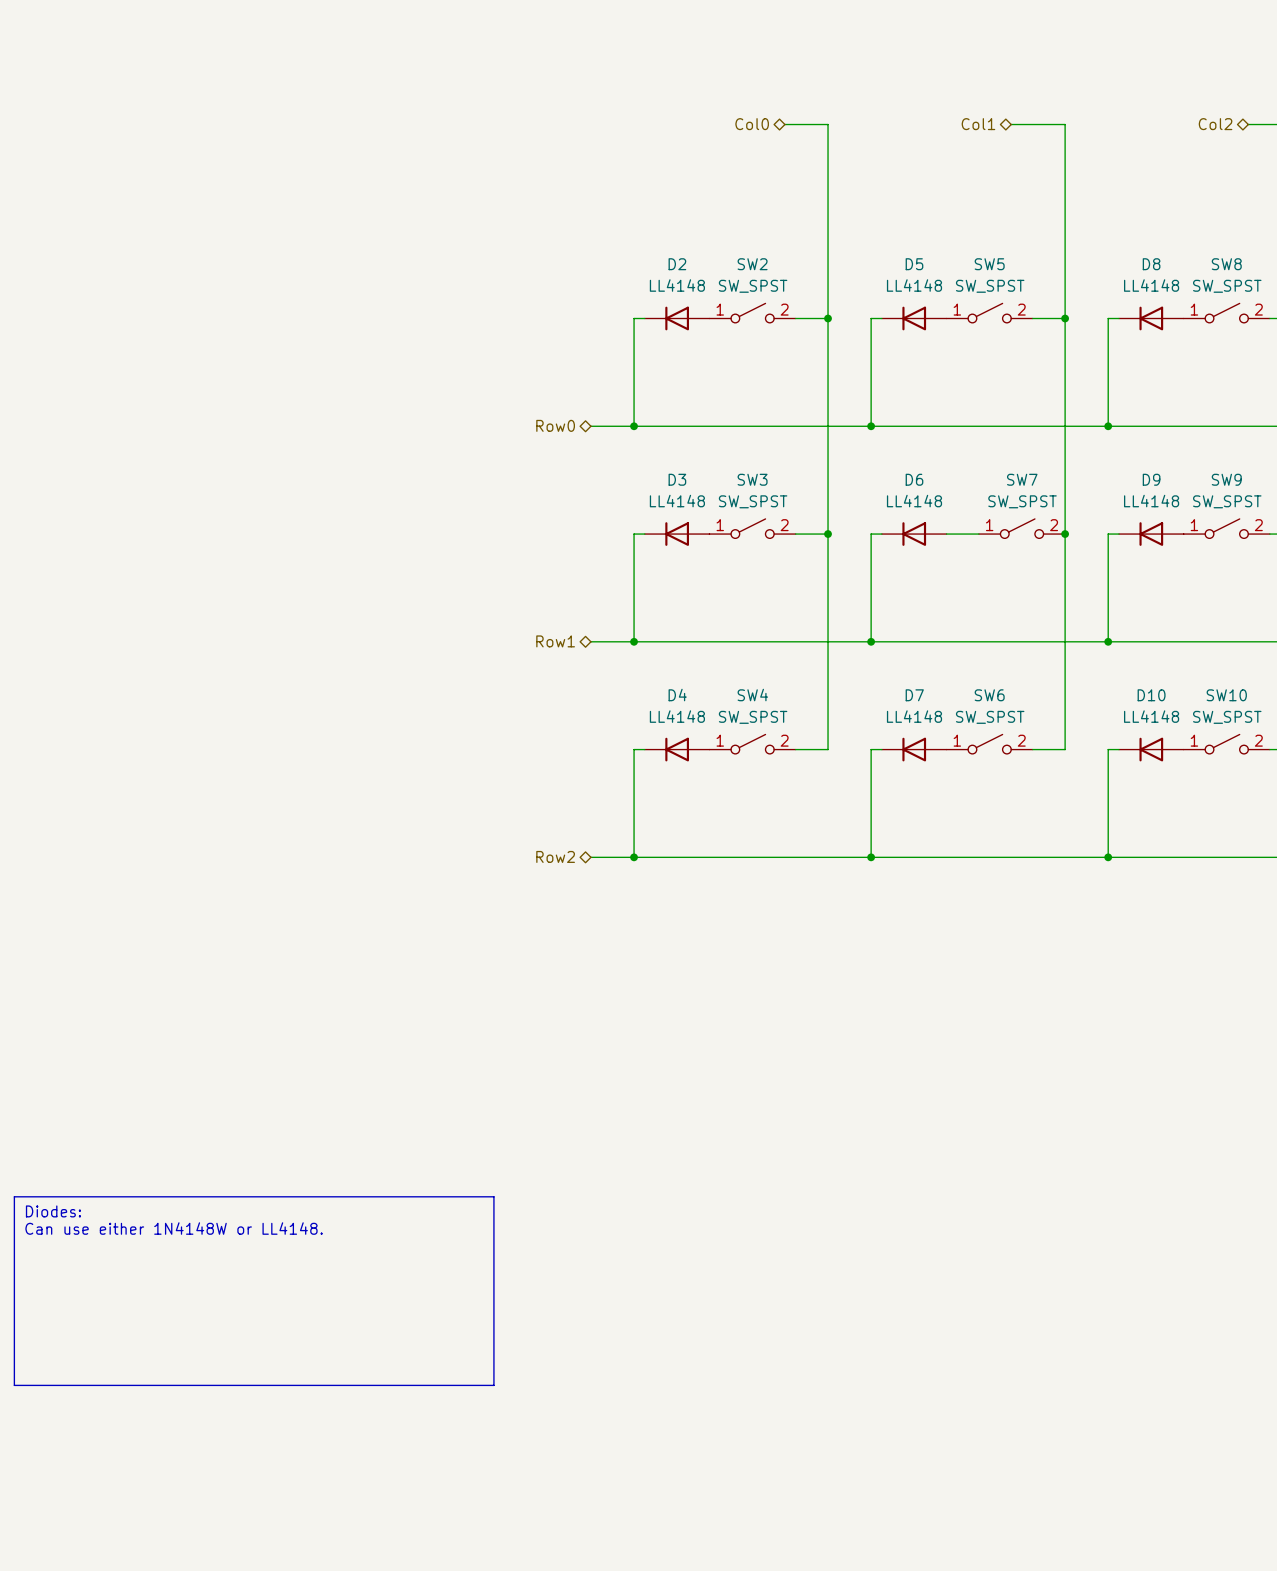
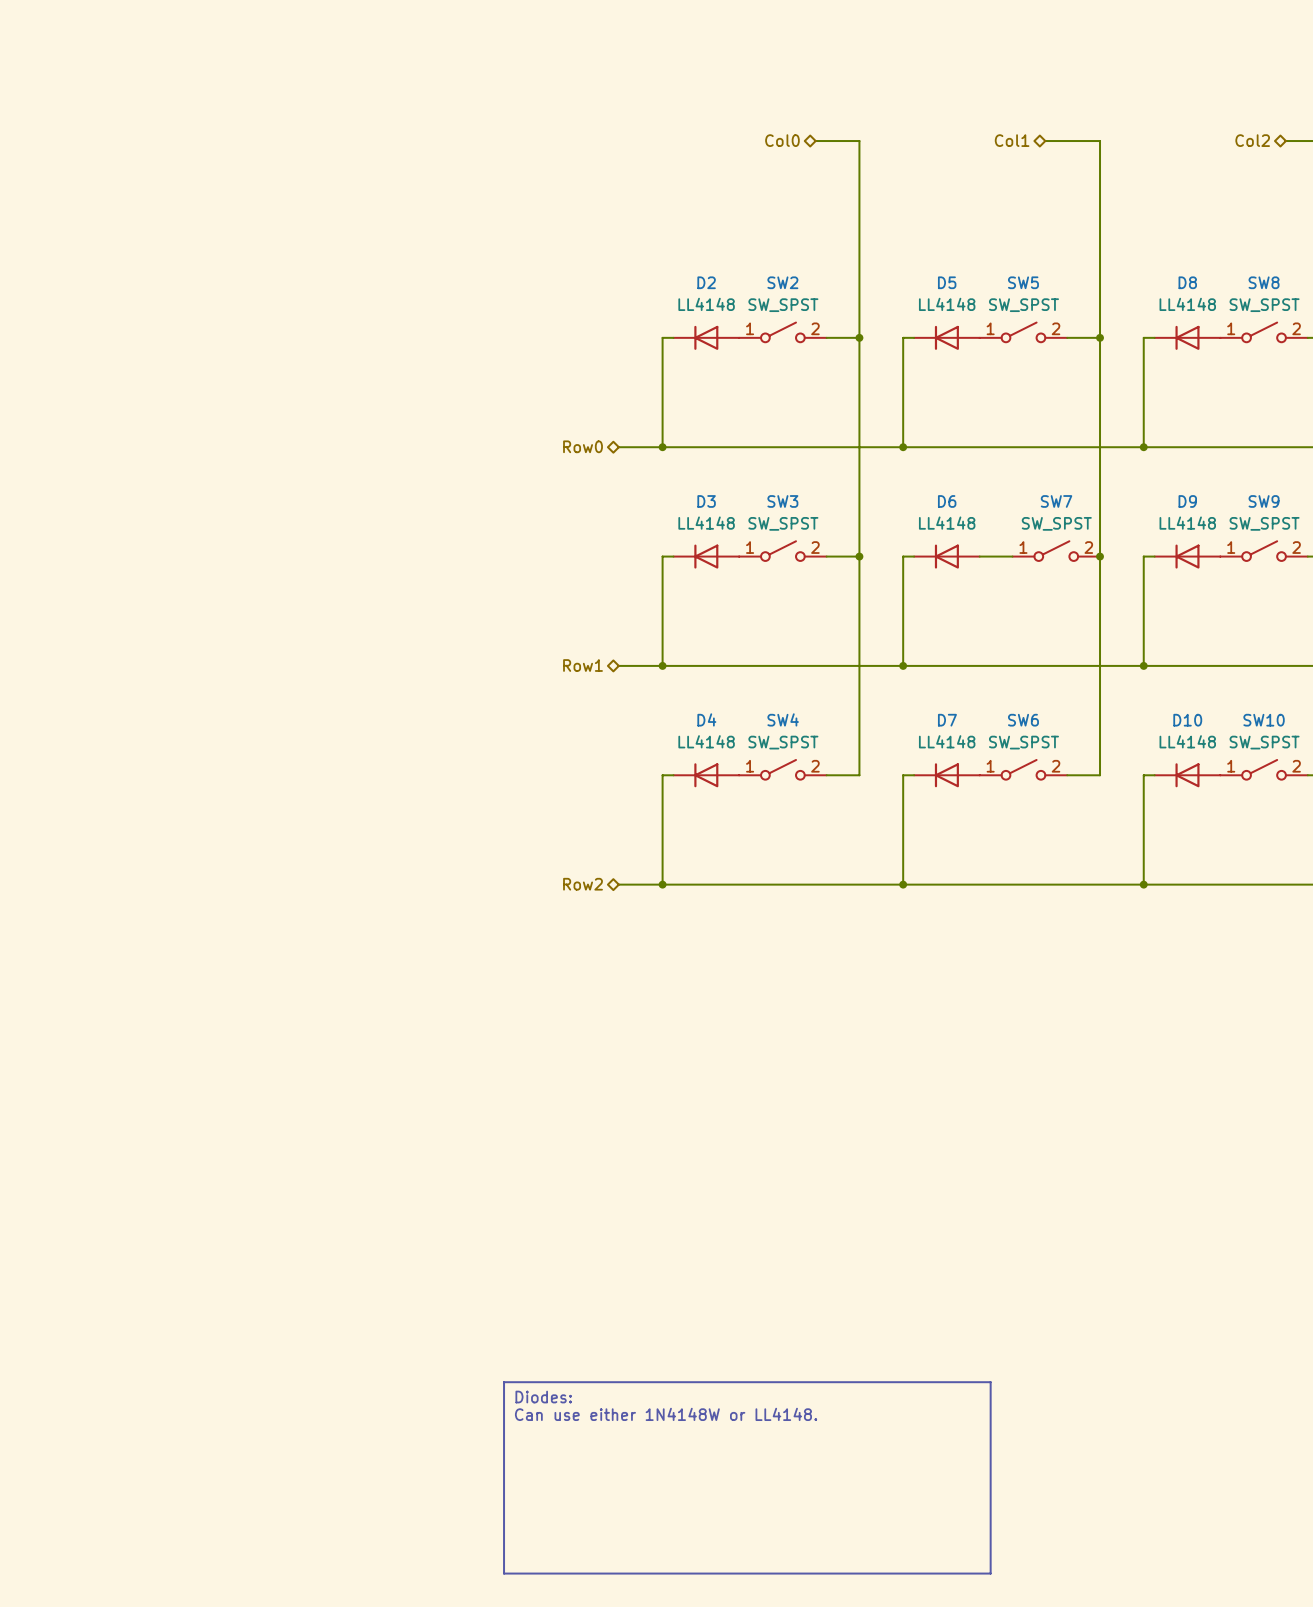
line: (14, 1196) (493, 1196) (493, 1385) (14, 1385) (14, 1196) -> none
text: Diodes: (53, 1211) -> none
text: Can use either 1N4148W or LL4148. (174, 1228) -> none
line: none -> (504, 1382) (990, 1382) (990, 1573) (504, 1573) (504, 1382)
text: none -> Diodes: (543, 1397)
text: none -> Can use either 1N4148W or LL4148. (666, 1414)

